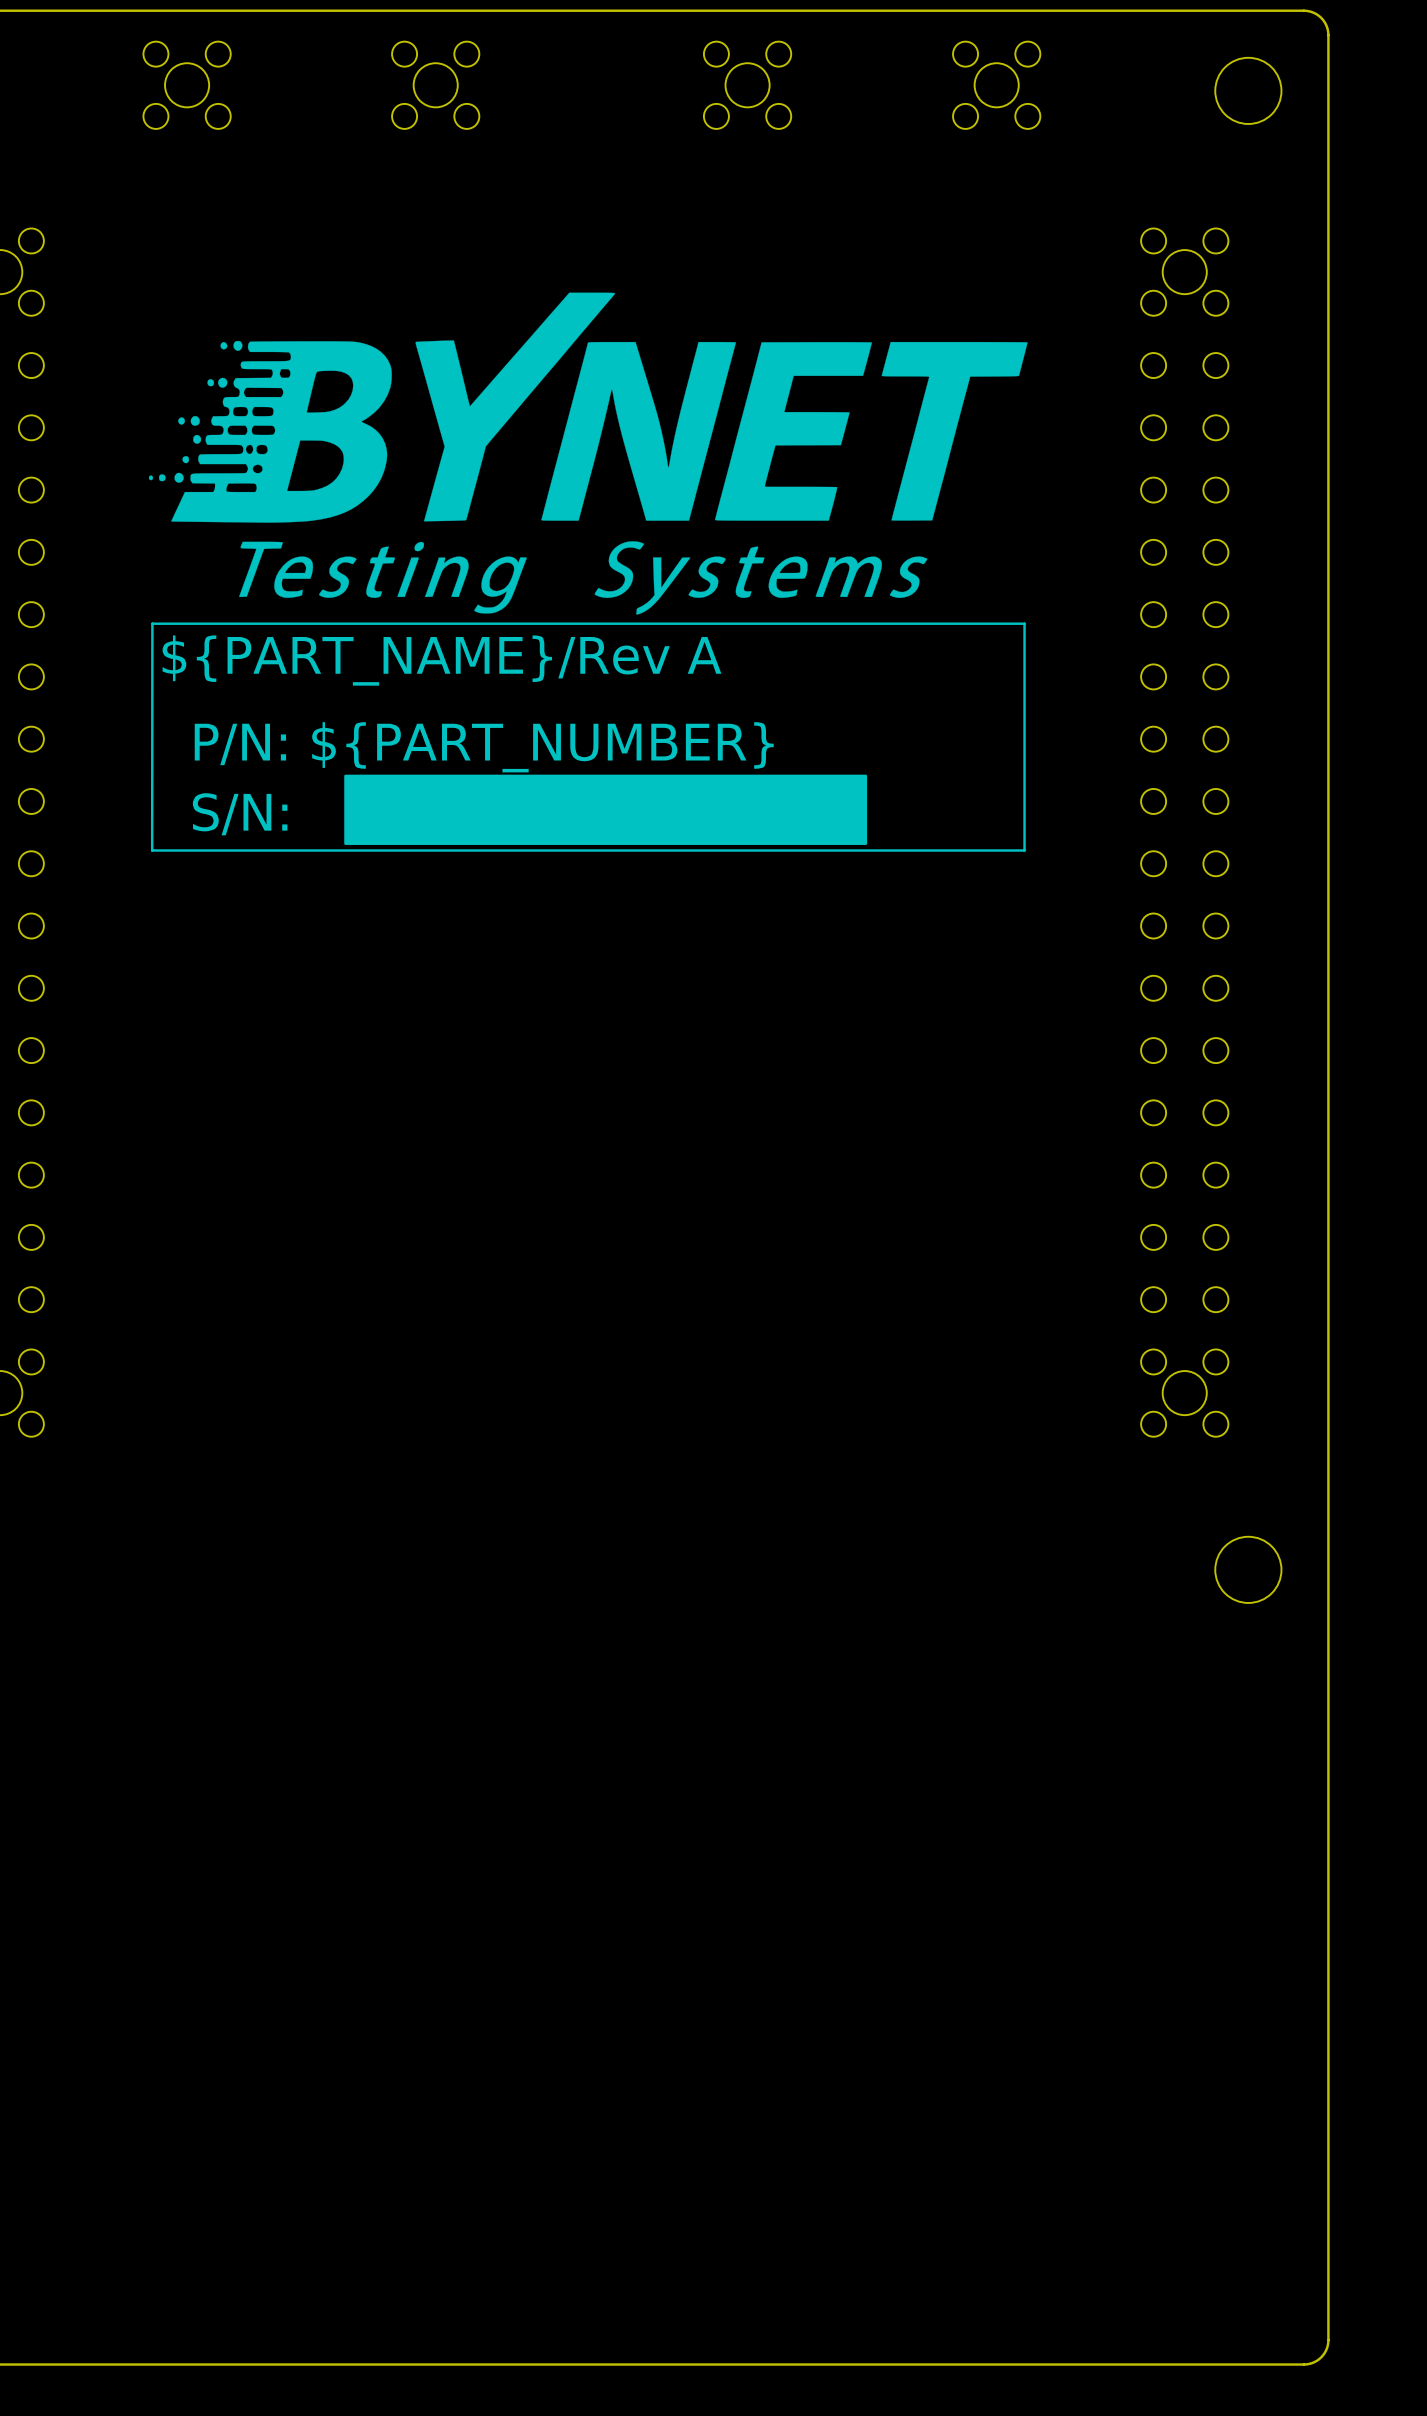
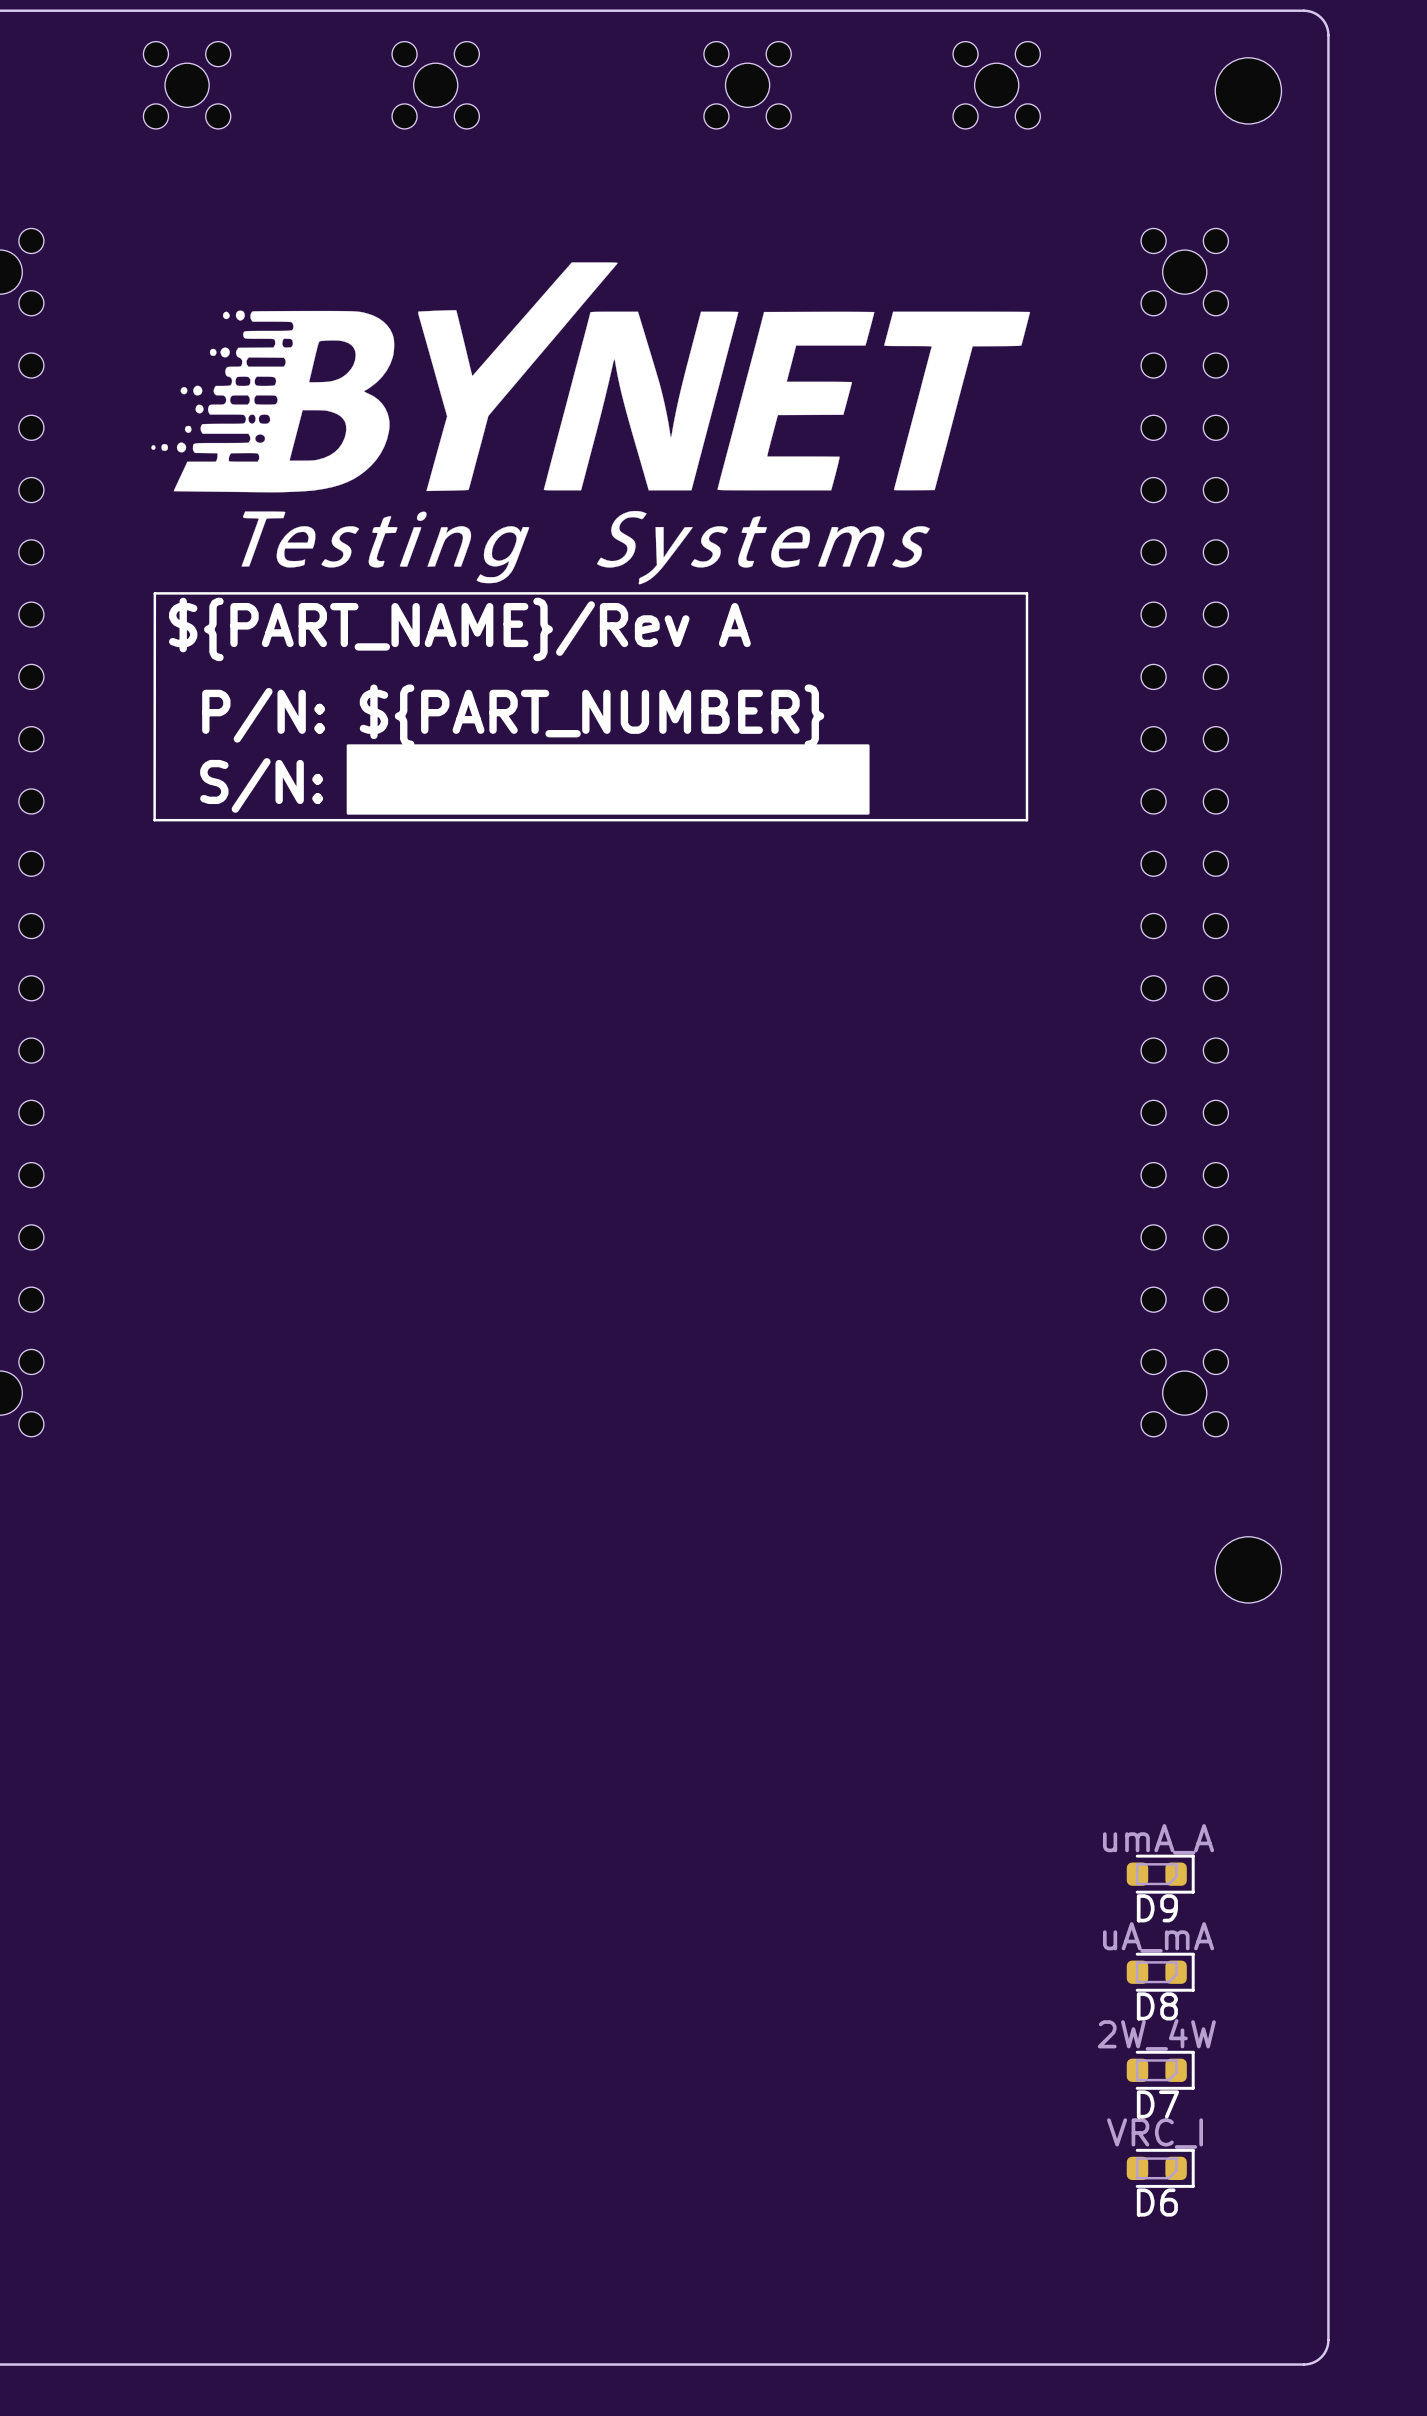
drawing position: (588, 453) -> (590, 423)
line: (1024, 623) (152, 623) (152, 850) (1024, 850) (1024, 623) -> (1026, 593) (1026, 820) (154, 820) (154, 593) (1026, 593)
text position: ${PART_NAME}/Rev A (441, 660) -> ${PART_NAME}/Rev A (459, 629)
text position: P/N: ${PART_NUMBER} (484, 747) -> P/N: ${PART_NUMBER} (513, 716)
drawing position: (605, 809) -> (608, 779)
text position: S/N: (240, 814) -> S/N: (261, 785)
D9: none -> umA_A (1160, 1874)
D8: none -> uA_mA (1160, 1972)
D7: none -> 2W_4W (1160, 2070)
D6: none -> VRC_I (1160, 2168)

